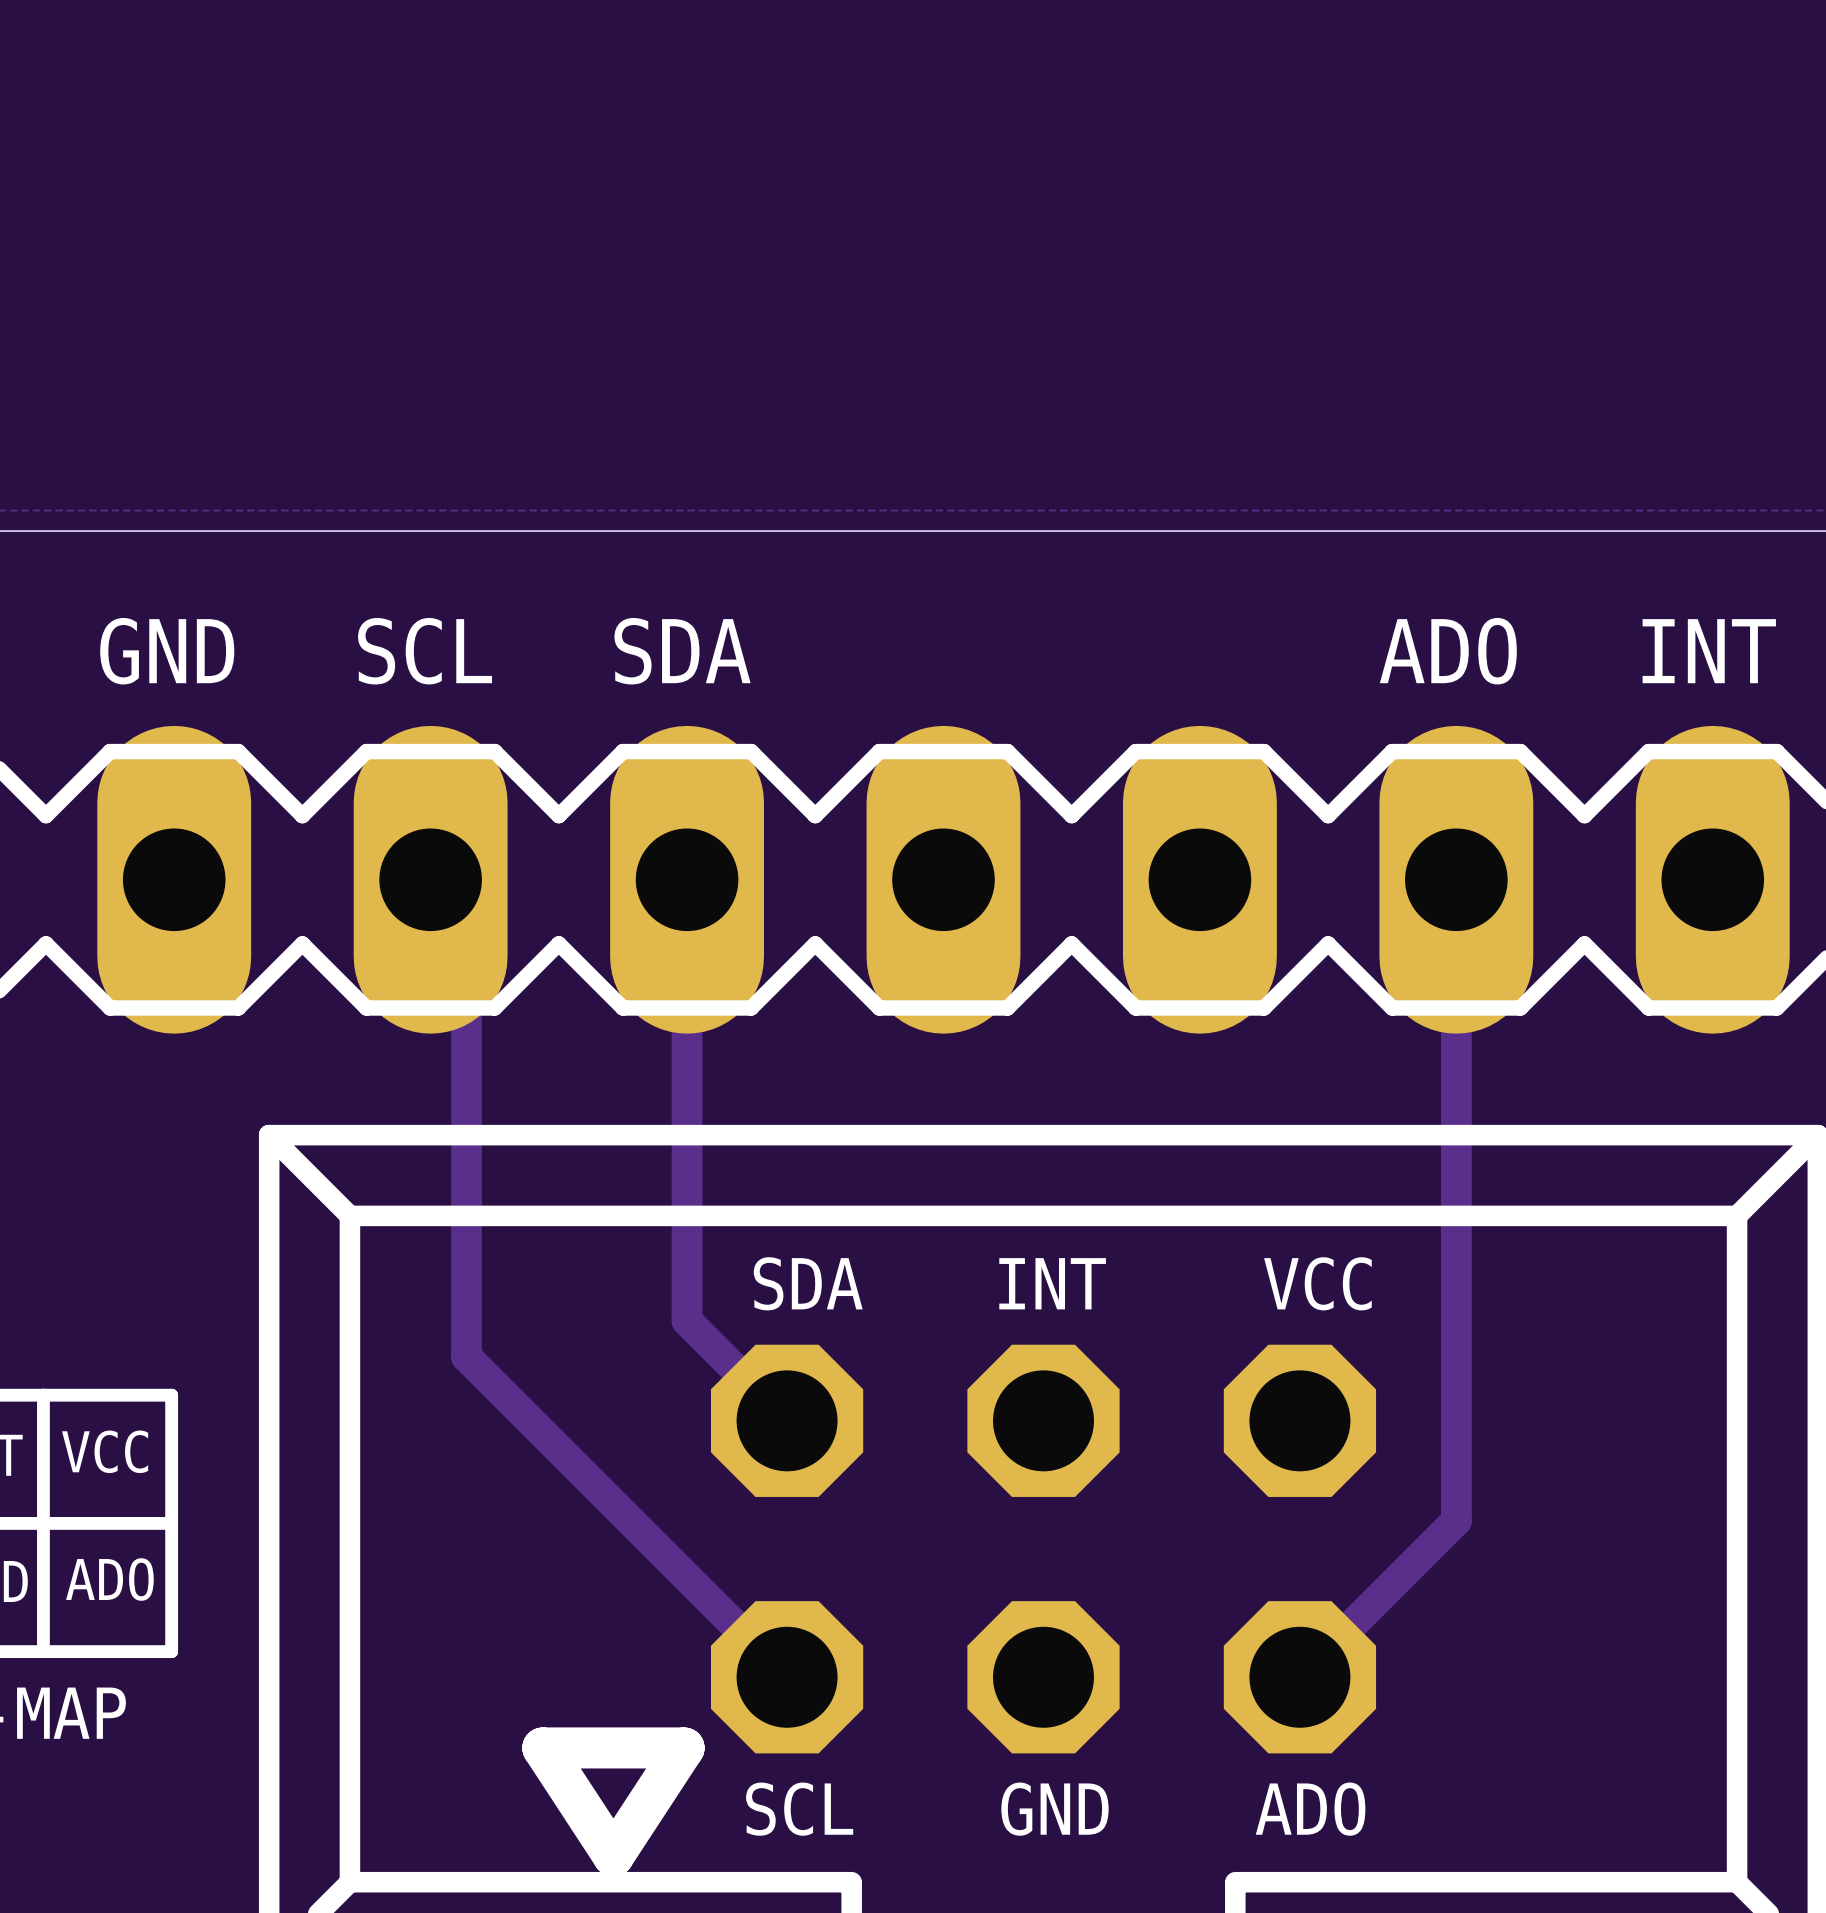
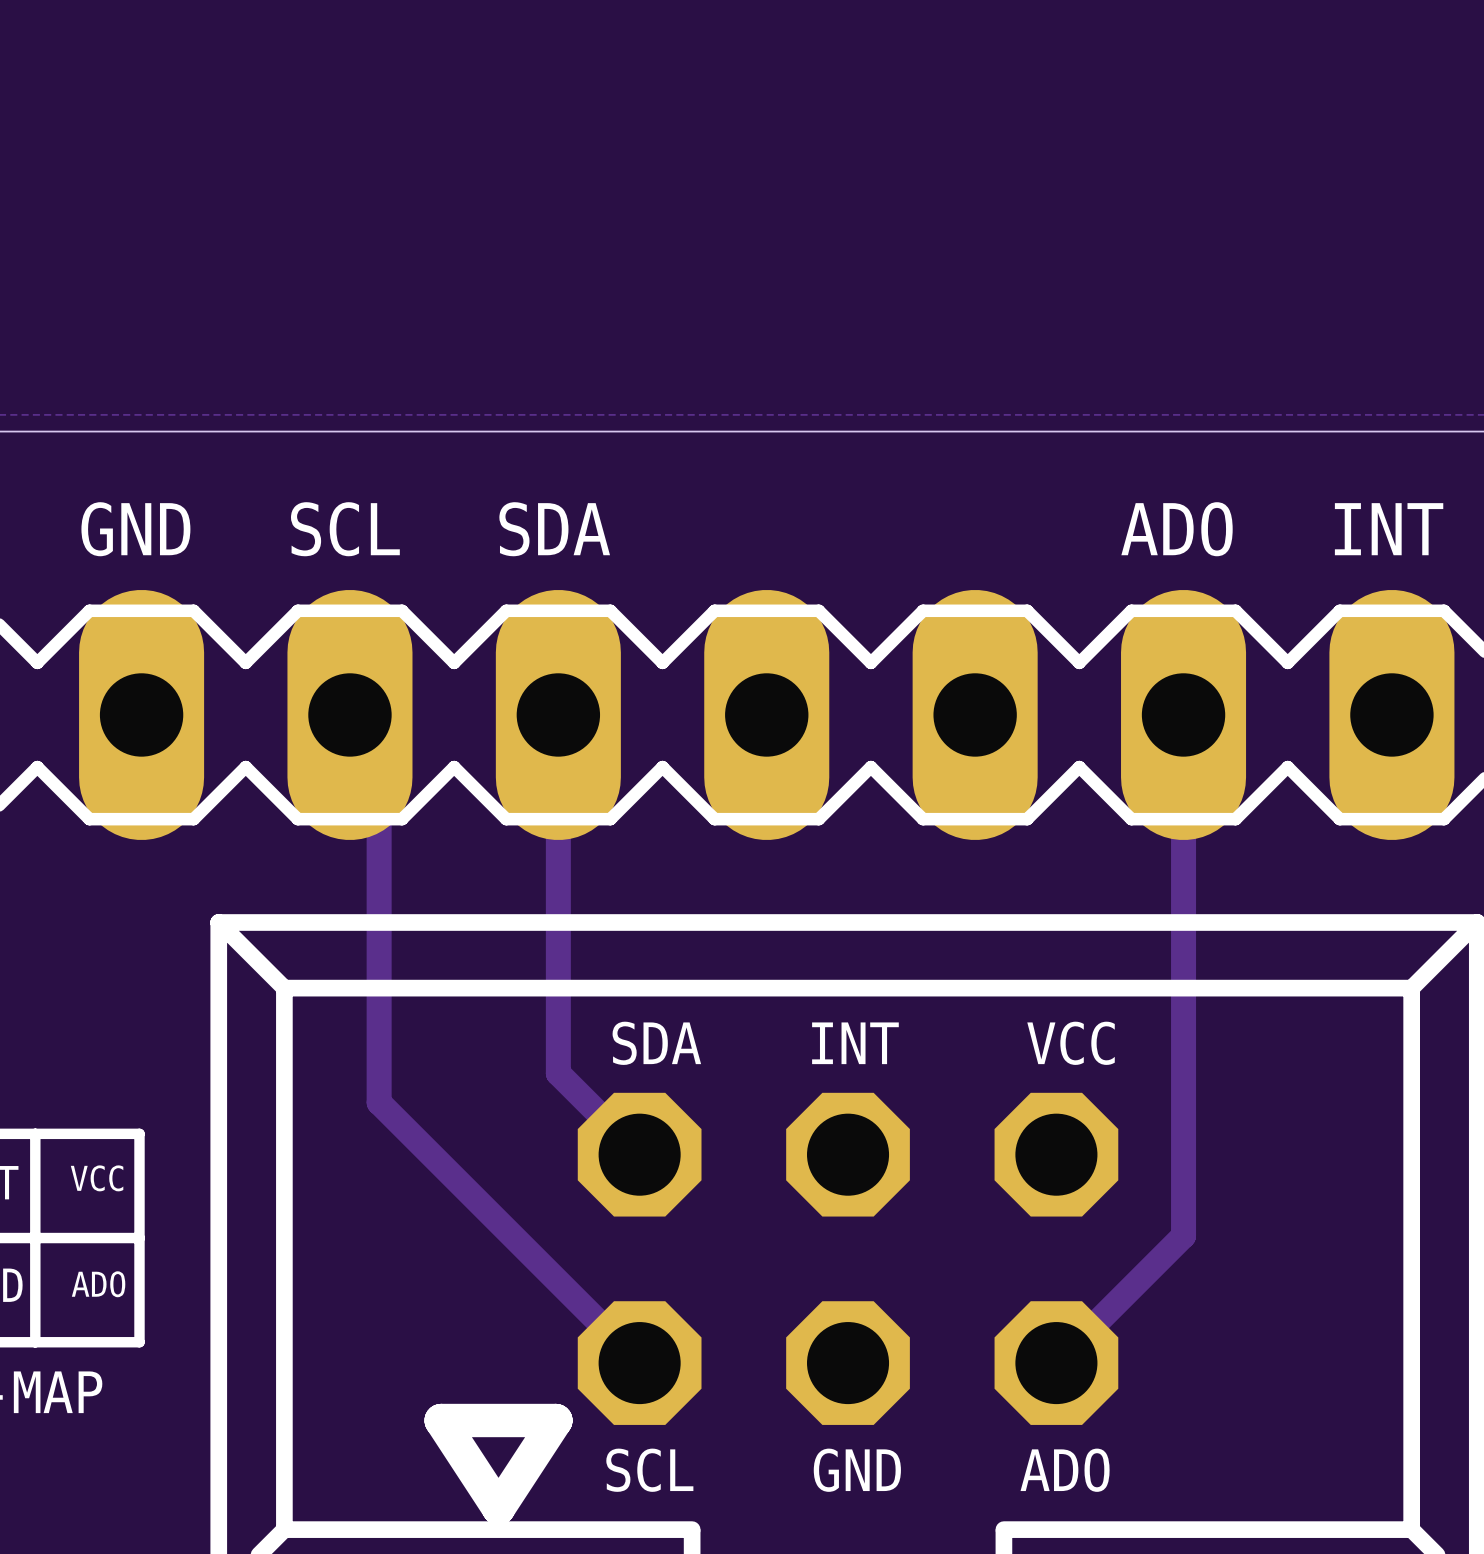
text position: VCC (105, 1451) -> VCC (97, 1178)
text position: ADO (109, 1579) -> ADO (98, 1284)

